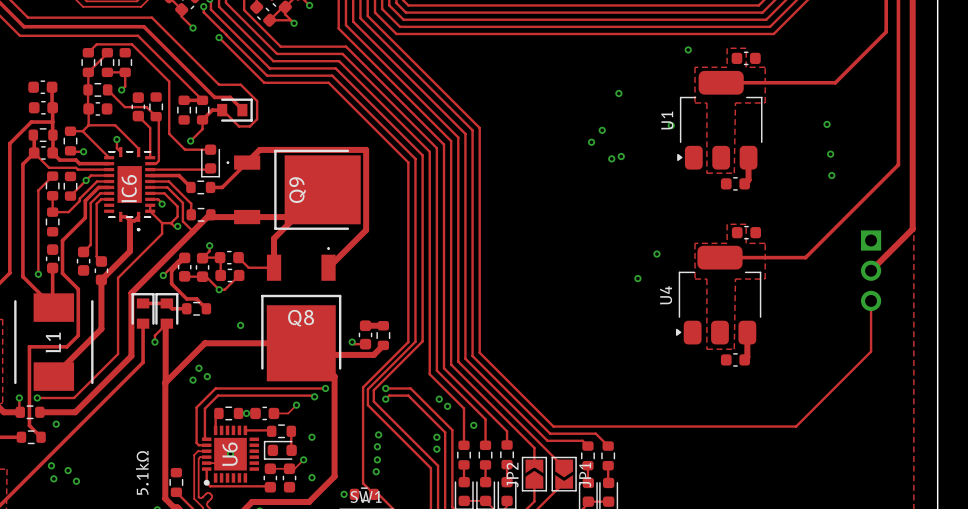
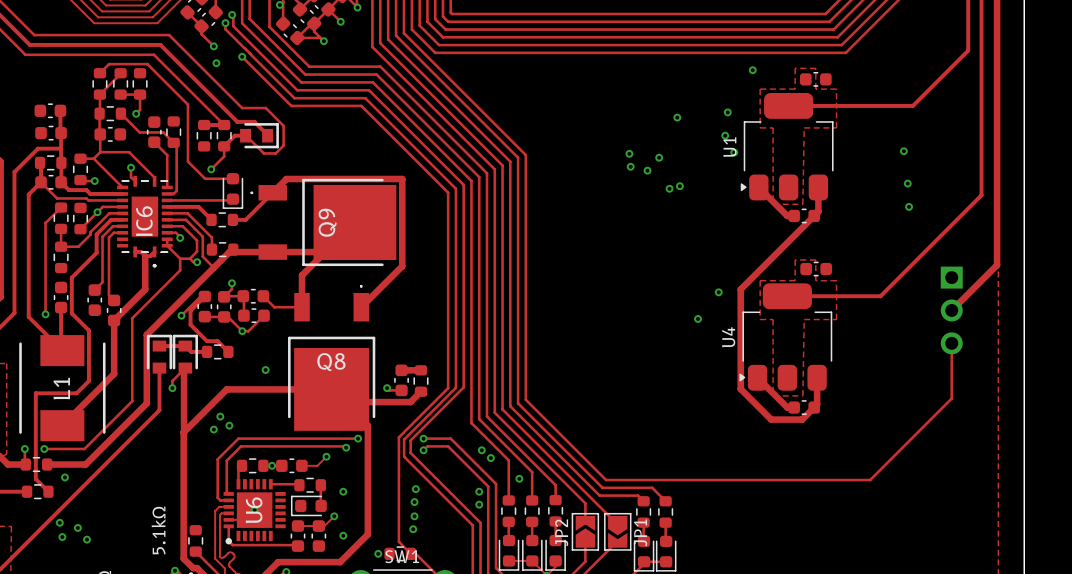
via: none -> (216, 63)
via: none -> (727, 112)
via: none -> (725, 135)
via: none -> (629, 153)
via: none -> (630, 166)
track: none -> (758, 187) (787, 215) (794, 215)
track: none -> (814, 215) (740, 289) (740, 389) (771, 419) (802, 419) (814, 407)
track: none -> (757, 377) (787, 407) (794, 407)

